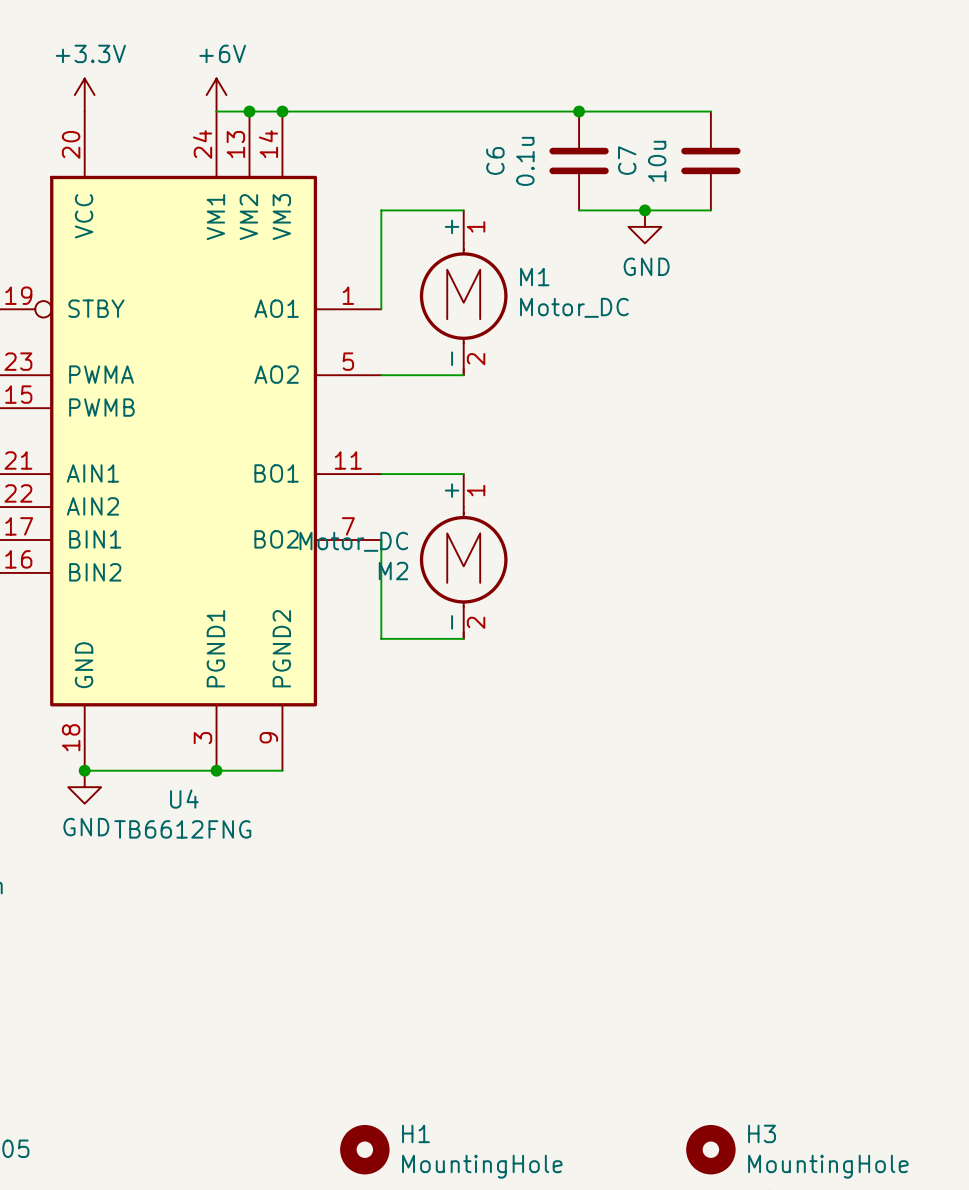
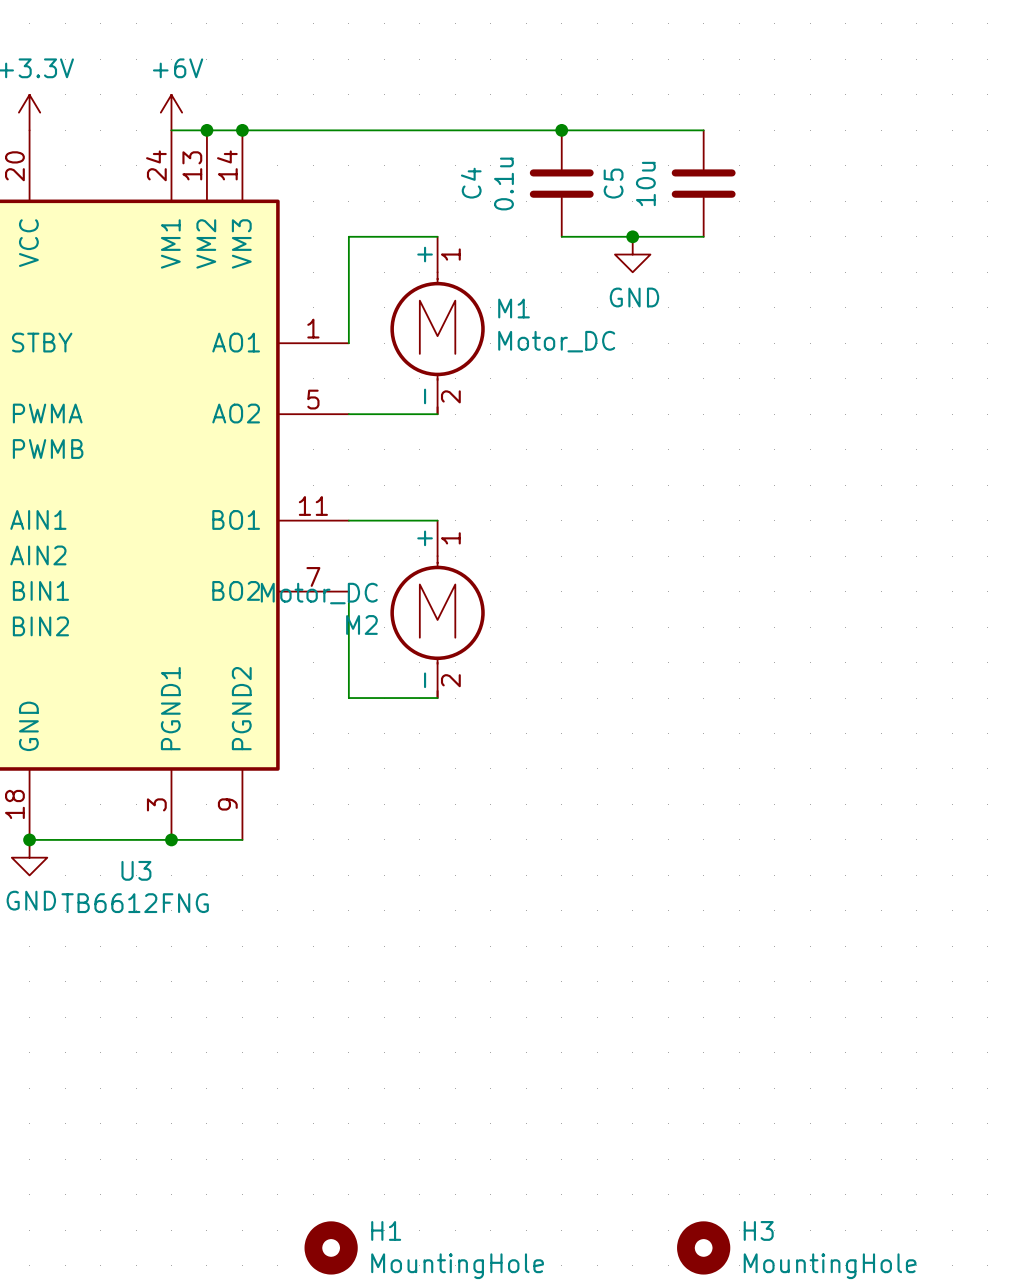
C6 name: C6 (495, 160) -> C4 (471, 183)
C7 name: C7 (627, 160) -> C5 (613, 183)
U4 name: U4 (184, 799) -> U3 (136, 870)

